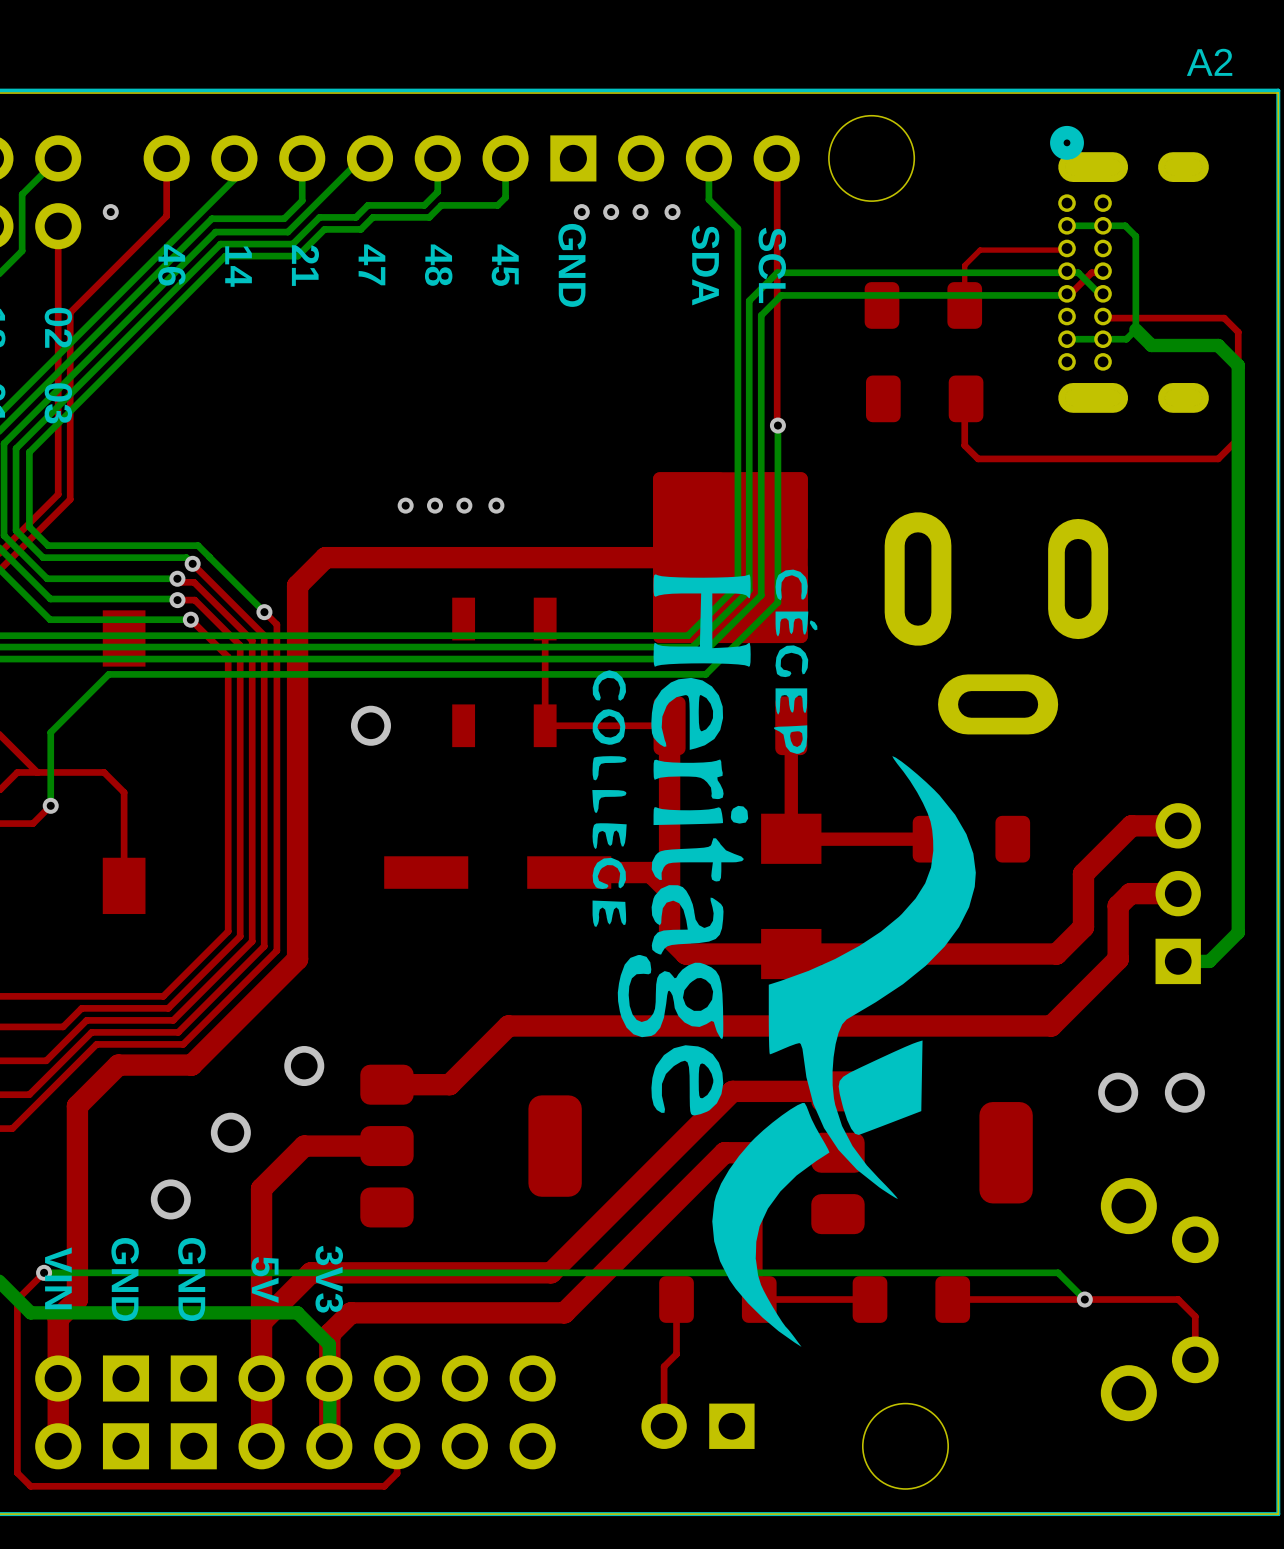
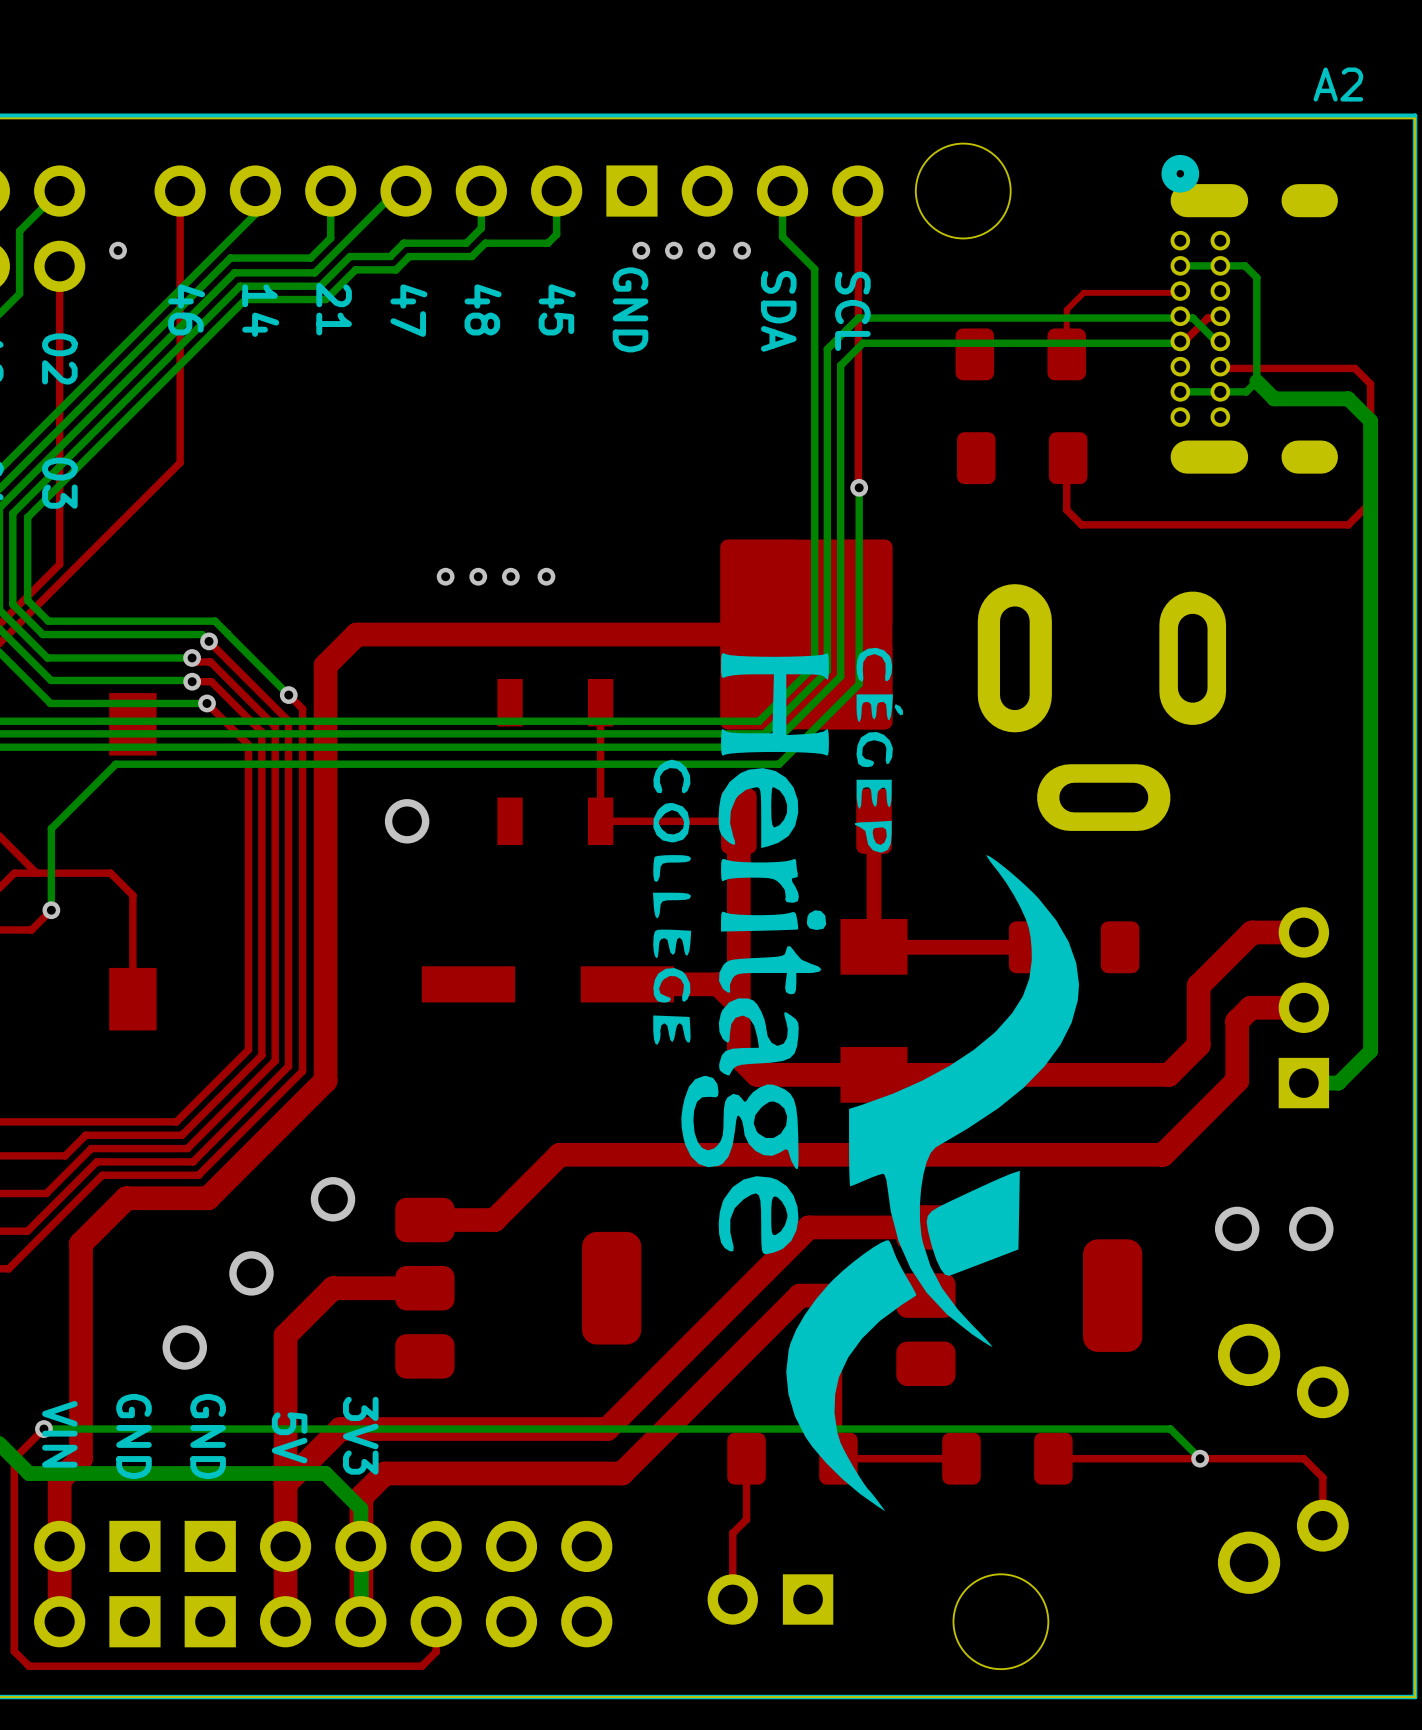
top track: (166, 216) (70, 312) (70, 499) -> (180, 255) (180, 462) (73, 569)

